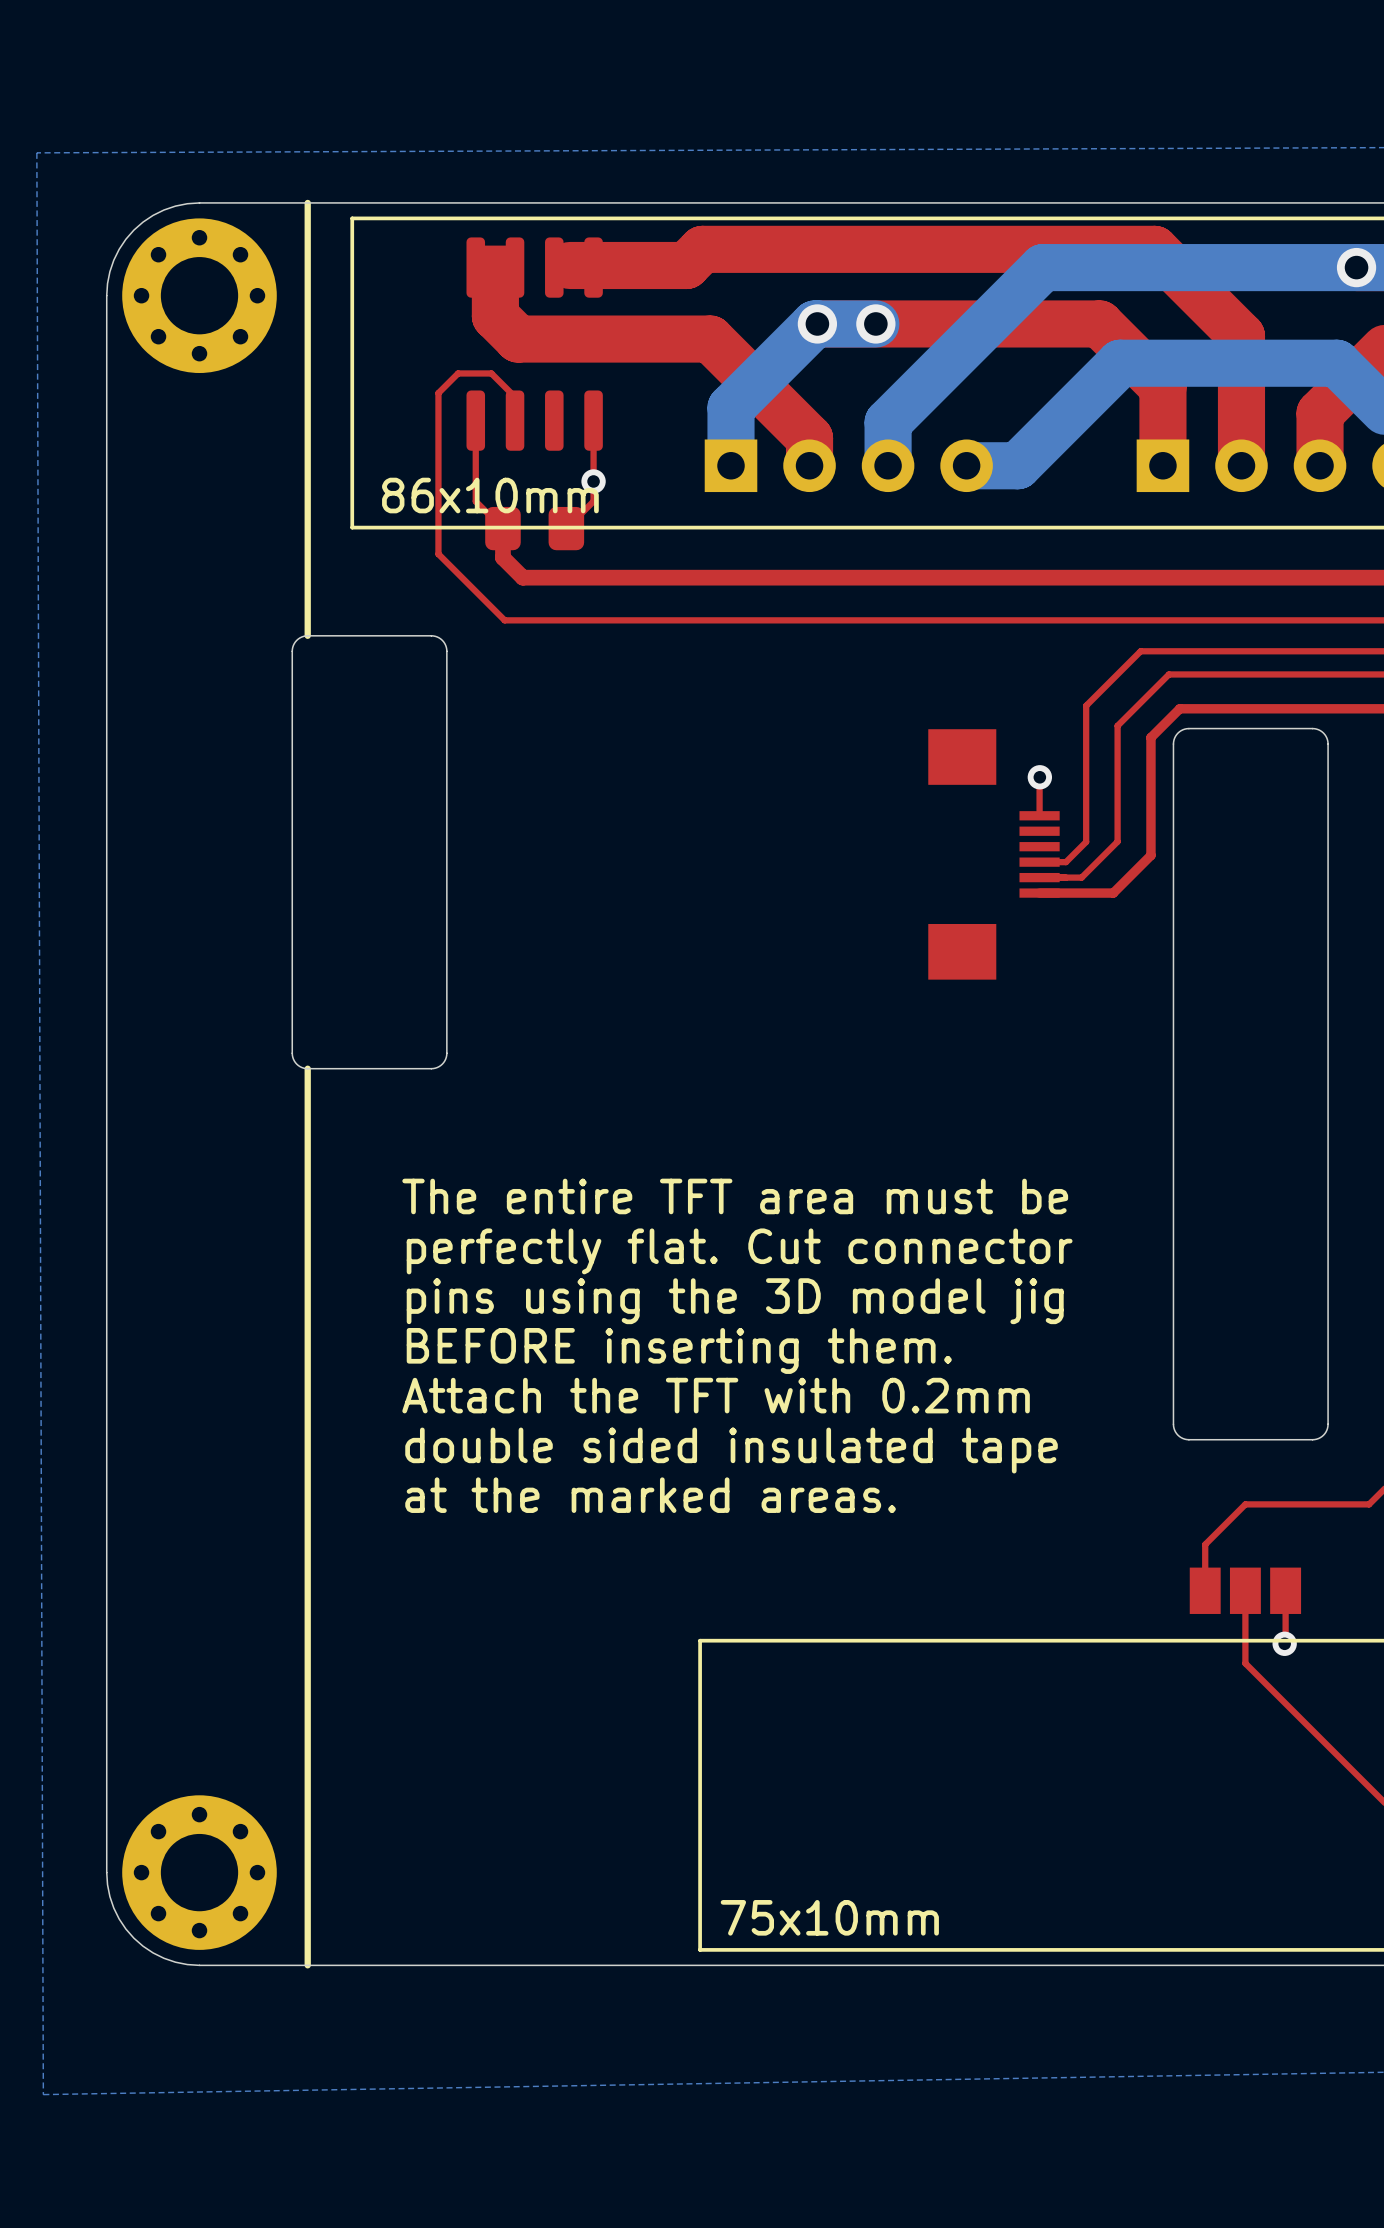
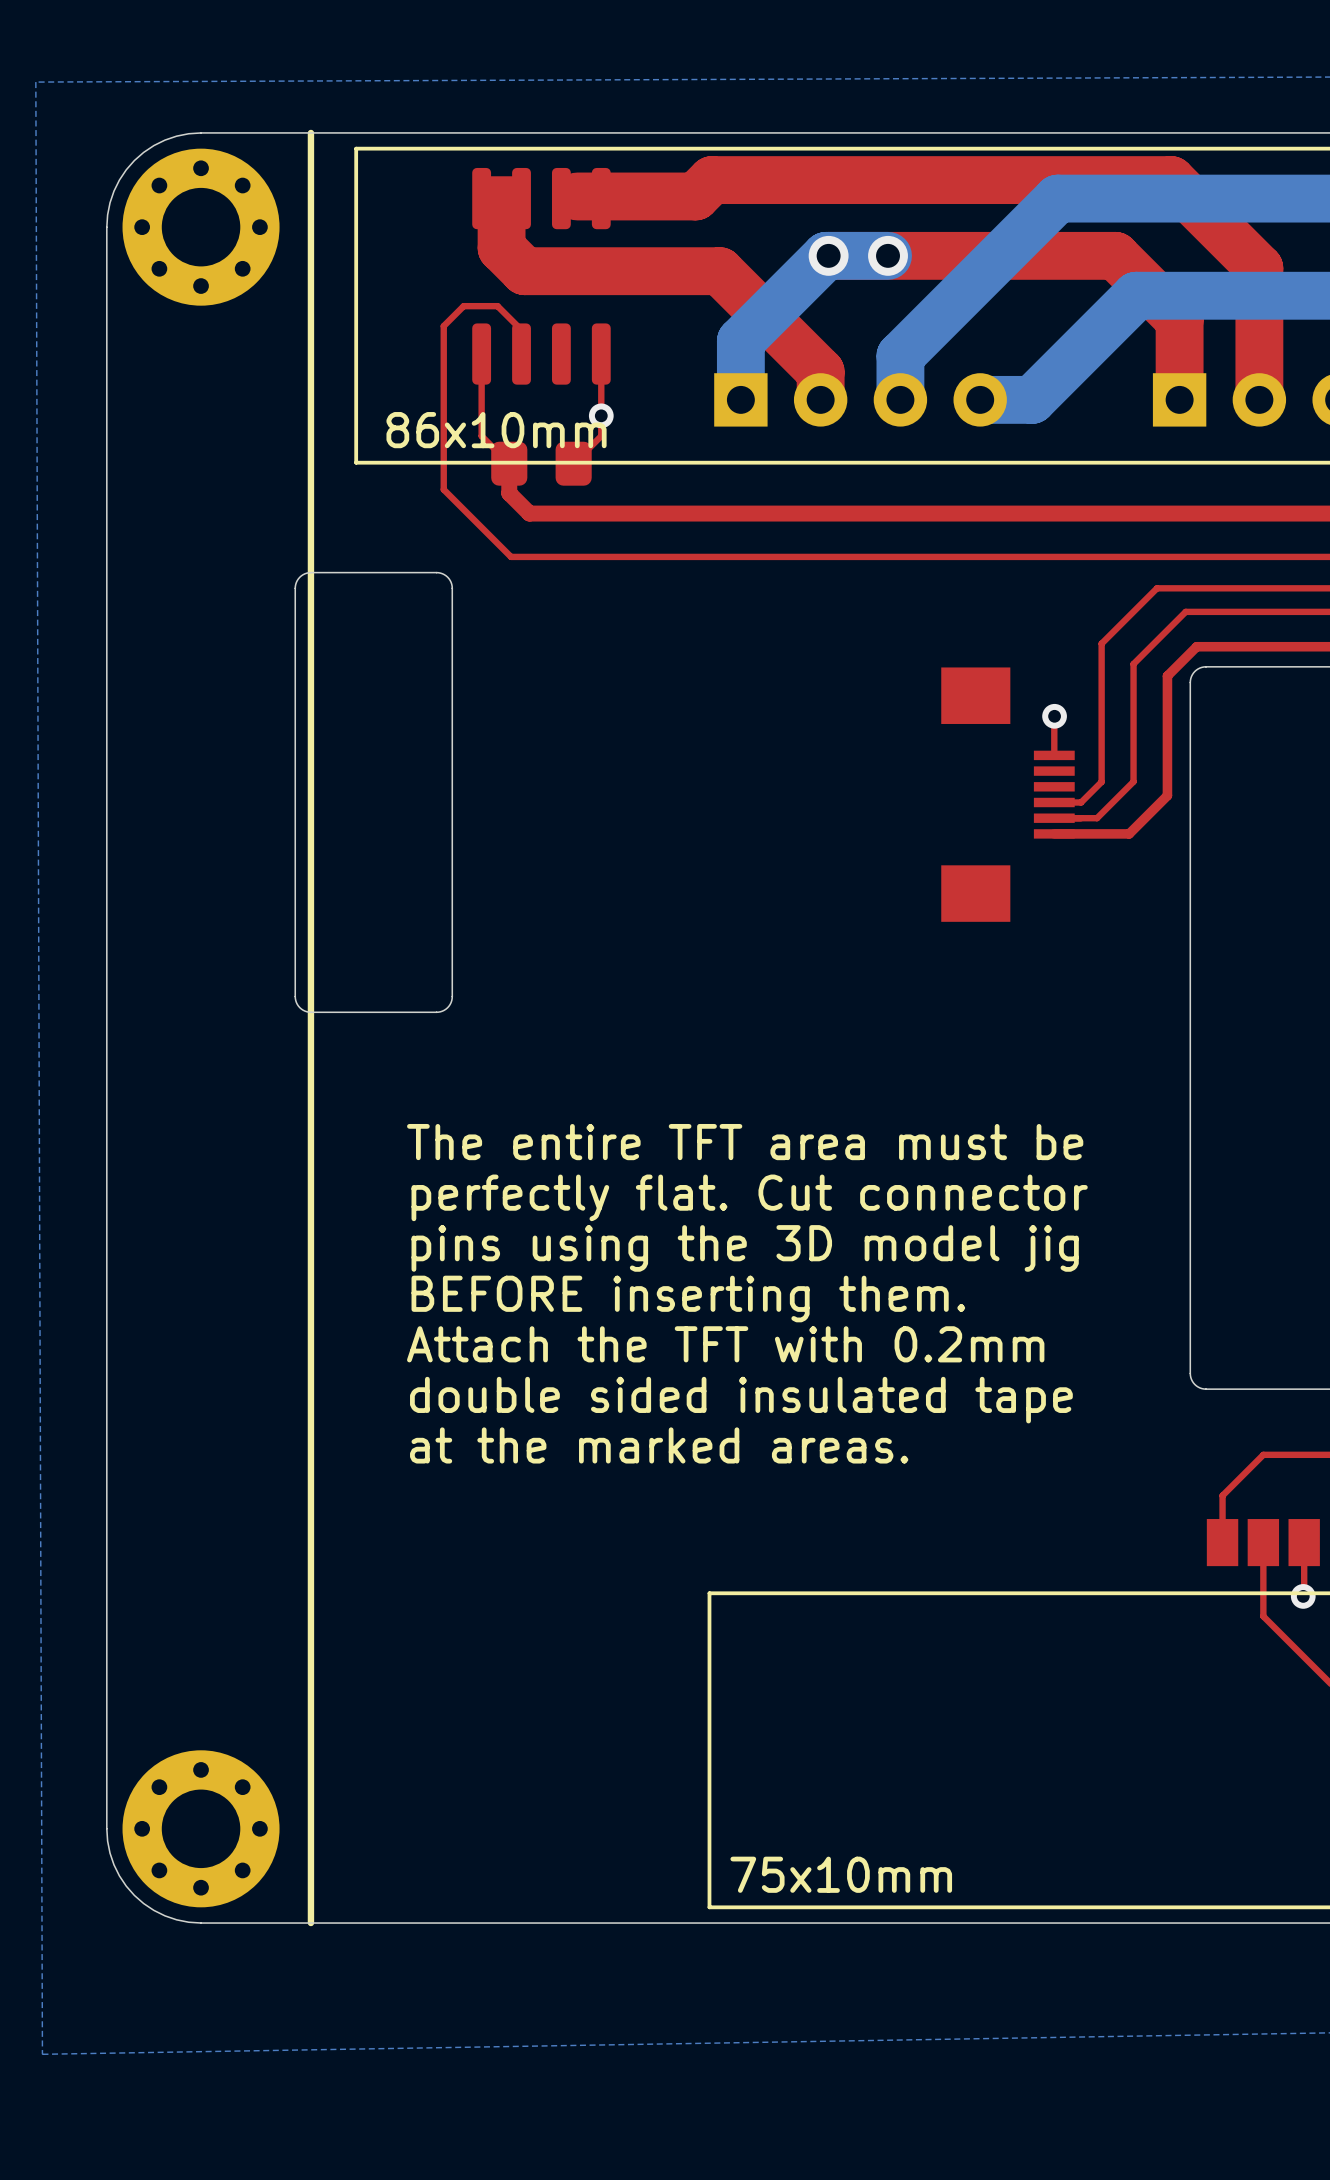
line: none -> (310, 572) (310, 1012)

